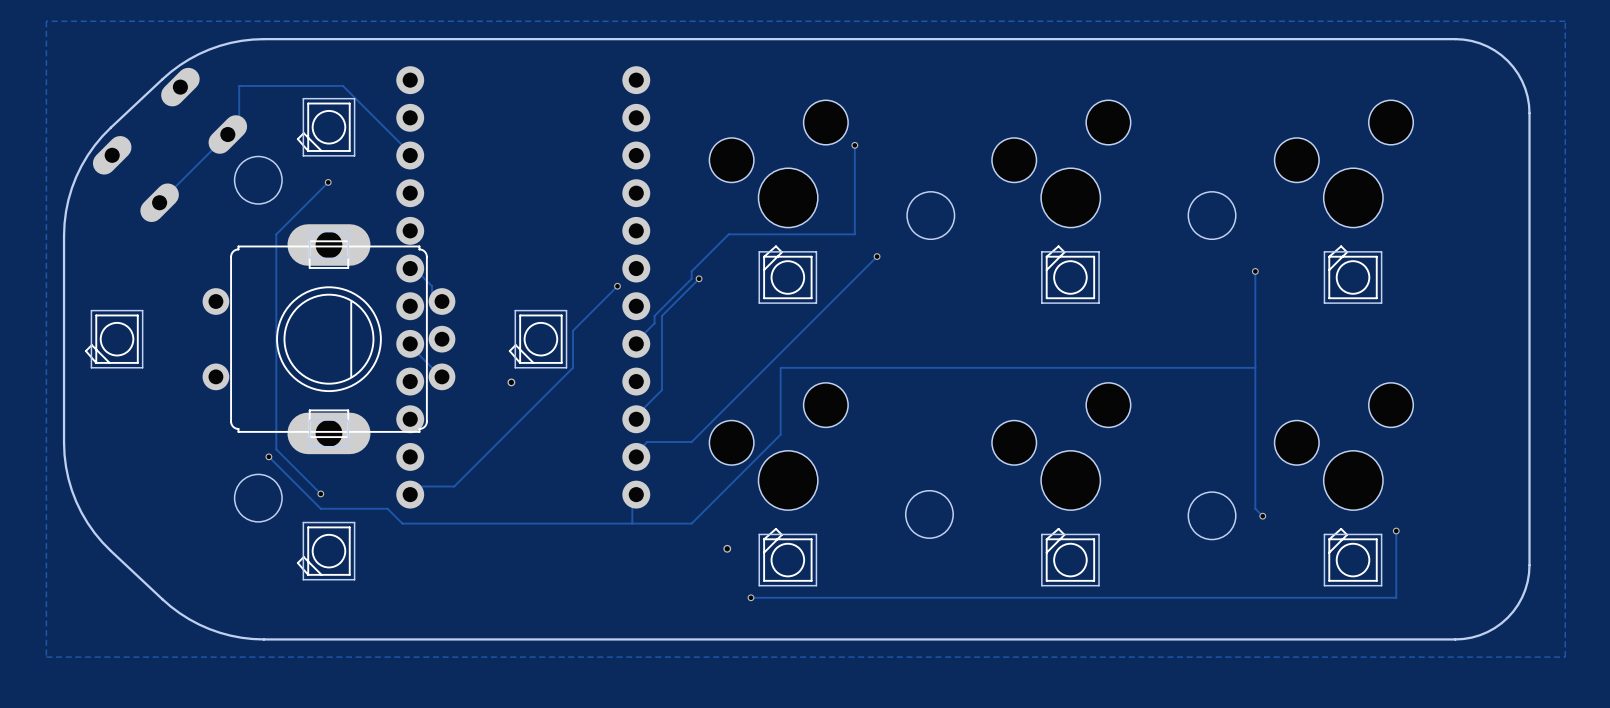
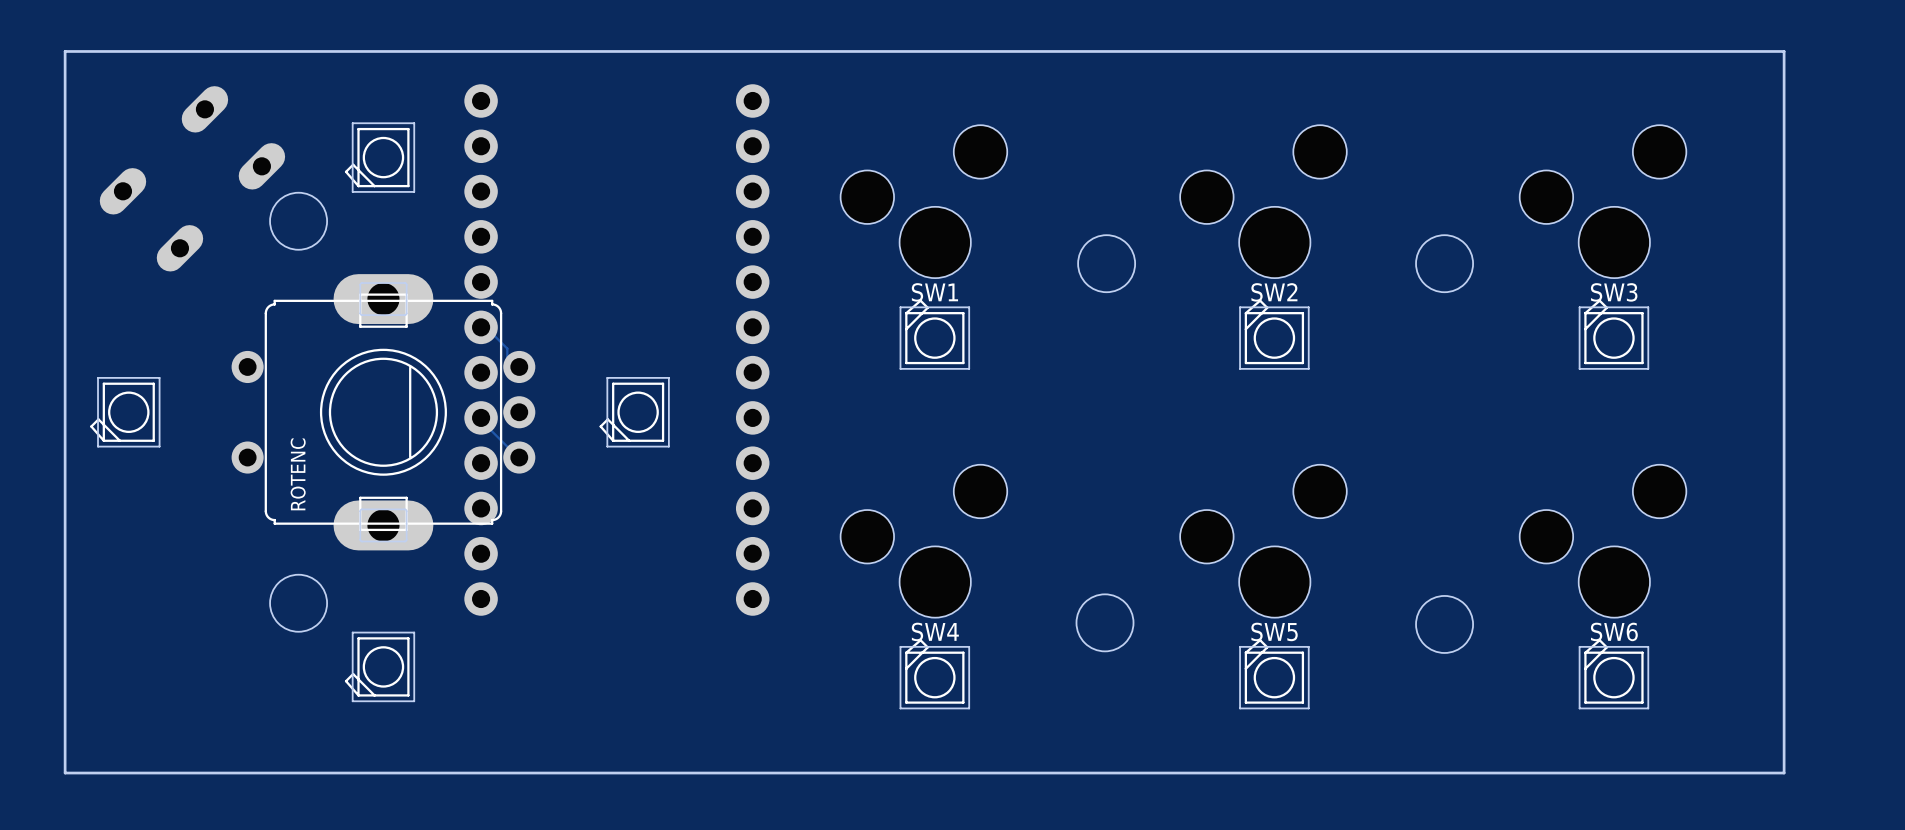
zone outline: (46, 21) (1565, 21) (1565, 657) (46, 657) (46, 21) -> none
track: (854, 145) (854, 234) (728, 234) (691, 271) (691, 278) (654, 315) (654, 323) (636, 343) -> none
via: (854, 145) -> none
track: (410, 155) (409, 152) (343, 85) (239, 85) (239, 123) (159, 202) -> none
track: (328, 182) (276, 234) (276, 449) (320, 493) -> none
via: (328, 182) -> none
board edge: (64, 235) (66, 211) (71, 188) (81, 165) (102, 136) (179, 65) (209, 49) (241, 40) (263, 39) (1455, 39) (1479, 43) (1494, 50) (1513, 67) (1522, 81) (1529, 105) (1529, 565) (1527, 581) (1522, 597) (1507, 617) (1494, 628) (1479, 635) (1455, 639) -> (65, 288) (65, 51) (1784, 51) (1784, 773) (1736, 773)
SW1 name: none -> SW1 (934, 292)
SW2 name: none -> SW2 (1274, 292)
SW3 name: none -> SW3 (1614, 292)
track: (877, 256) (691, 442) (647, 442) (639, 449) (639, 456) (636, 456) -> none
via: (877, 256) -> none
track: (1255, 271) (1255, 508) (1262, 516) -> none
via: (1255, 271) -> none
track: (699, 278) (661, 315) (661, 390) (639, 412) (636, 419) -> none
via: (699, 278) -> none
track: (617, 286) (572, 330) (572, 367) (454, 486) (417, 486) (417, 493) (410, 494) -> none
via: (617, 286) -> none
track: (1255, 367) (780, 367) (780, 434) (691, 523) (402, 523) (387, 508) (320, 508) (268, 456) -> none
via: (511, 382) -> none
ROTENC name: none -> ROTENC (298, 474)
board edge: (64, 442) (68, 478) (76, 501) (87, 523) (110, 550) (162, 599) (189, 619) (209, 629) (230, 635) (263, 639) -> (65, 536) (65, 773) (305, 773)
via: (268, 456) -> none
via: (320, 493) -> none
track: (636, 494) (632, 501) (632, 523) -> none
via: (1262, 516) -> none
SW4 name: none -> SW4 (935, 631)
SW5 name: none -> SW5 (1274, 631)
SW6 name: none -> SW6 (1614, 631)
track: (1396, 531) (1396, 597) (750, 597) -> none
via: (1396, 531) -> none
via: (727, 548) -> none
via: (750, 597) -> none

